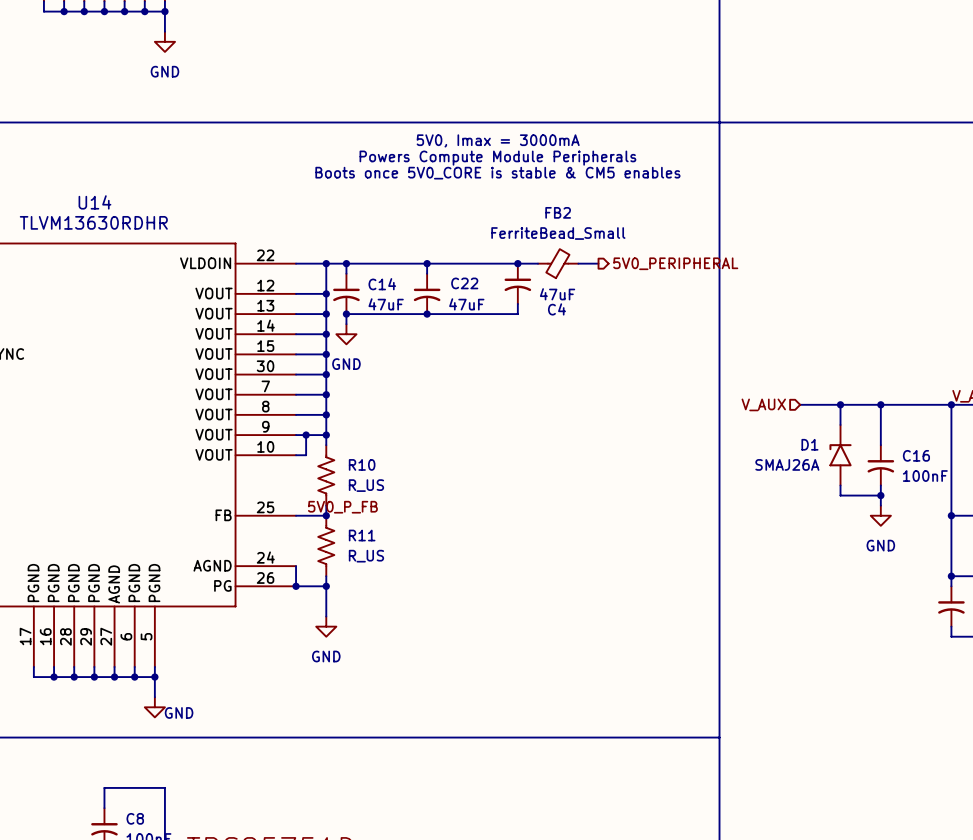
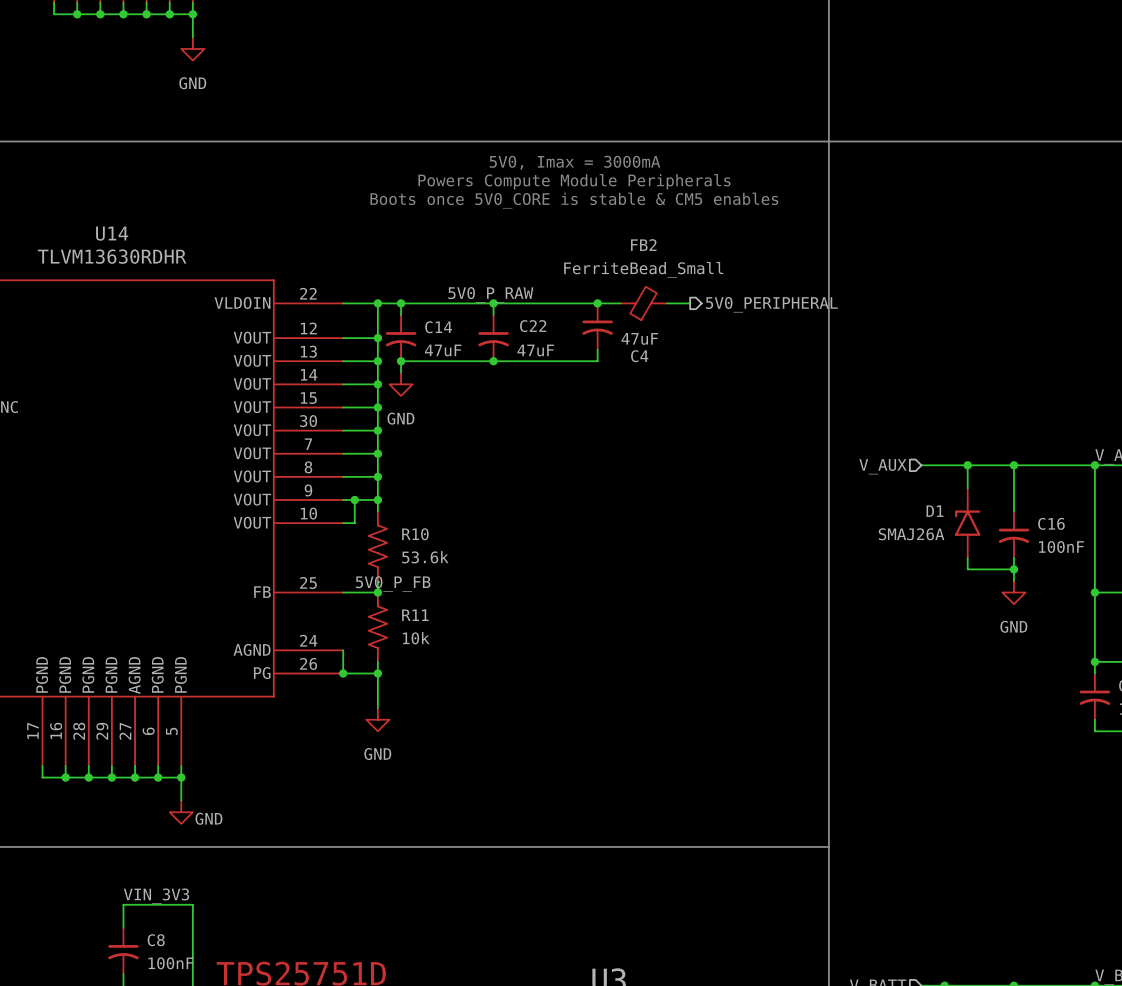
label: none -> 5V0_P_RAW (490, 294)
R10 value: R_US (366, 485) -> 53.6k (425, 557)
R11 value: R_US (366, 556) -> 10k (416, 638)
label: none -> VIN_3V3 (156, 896)

